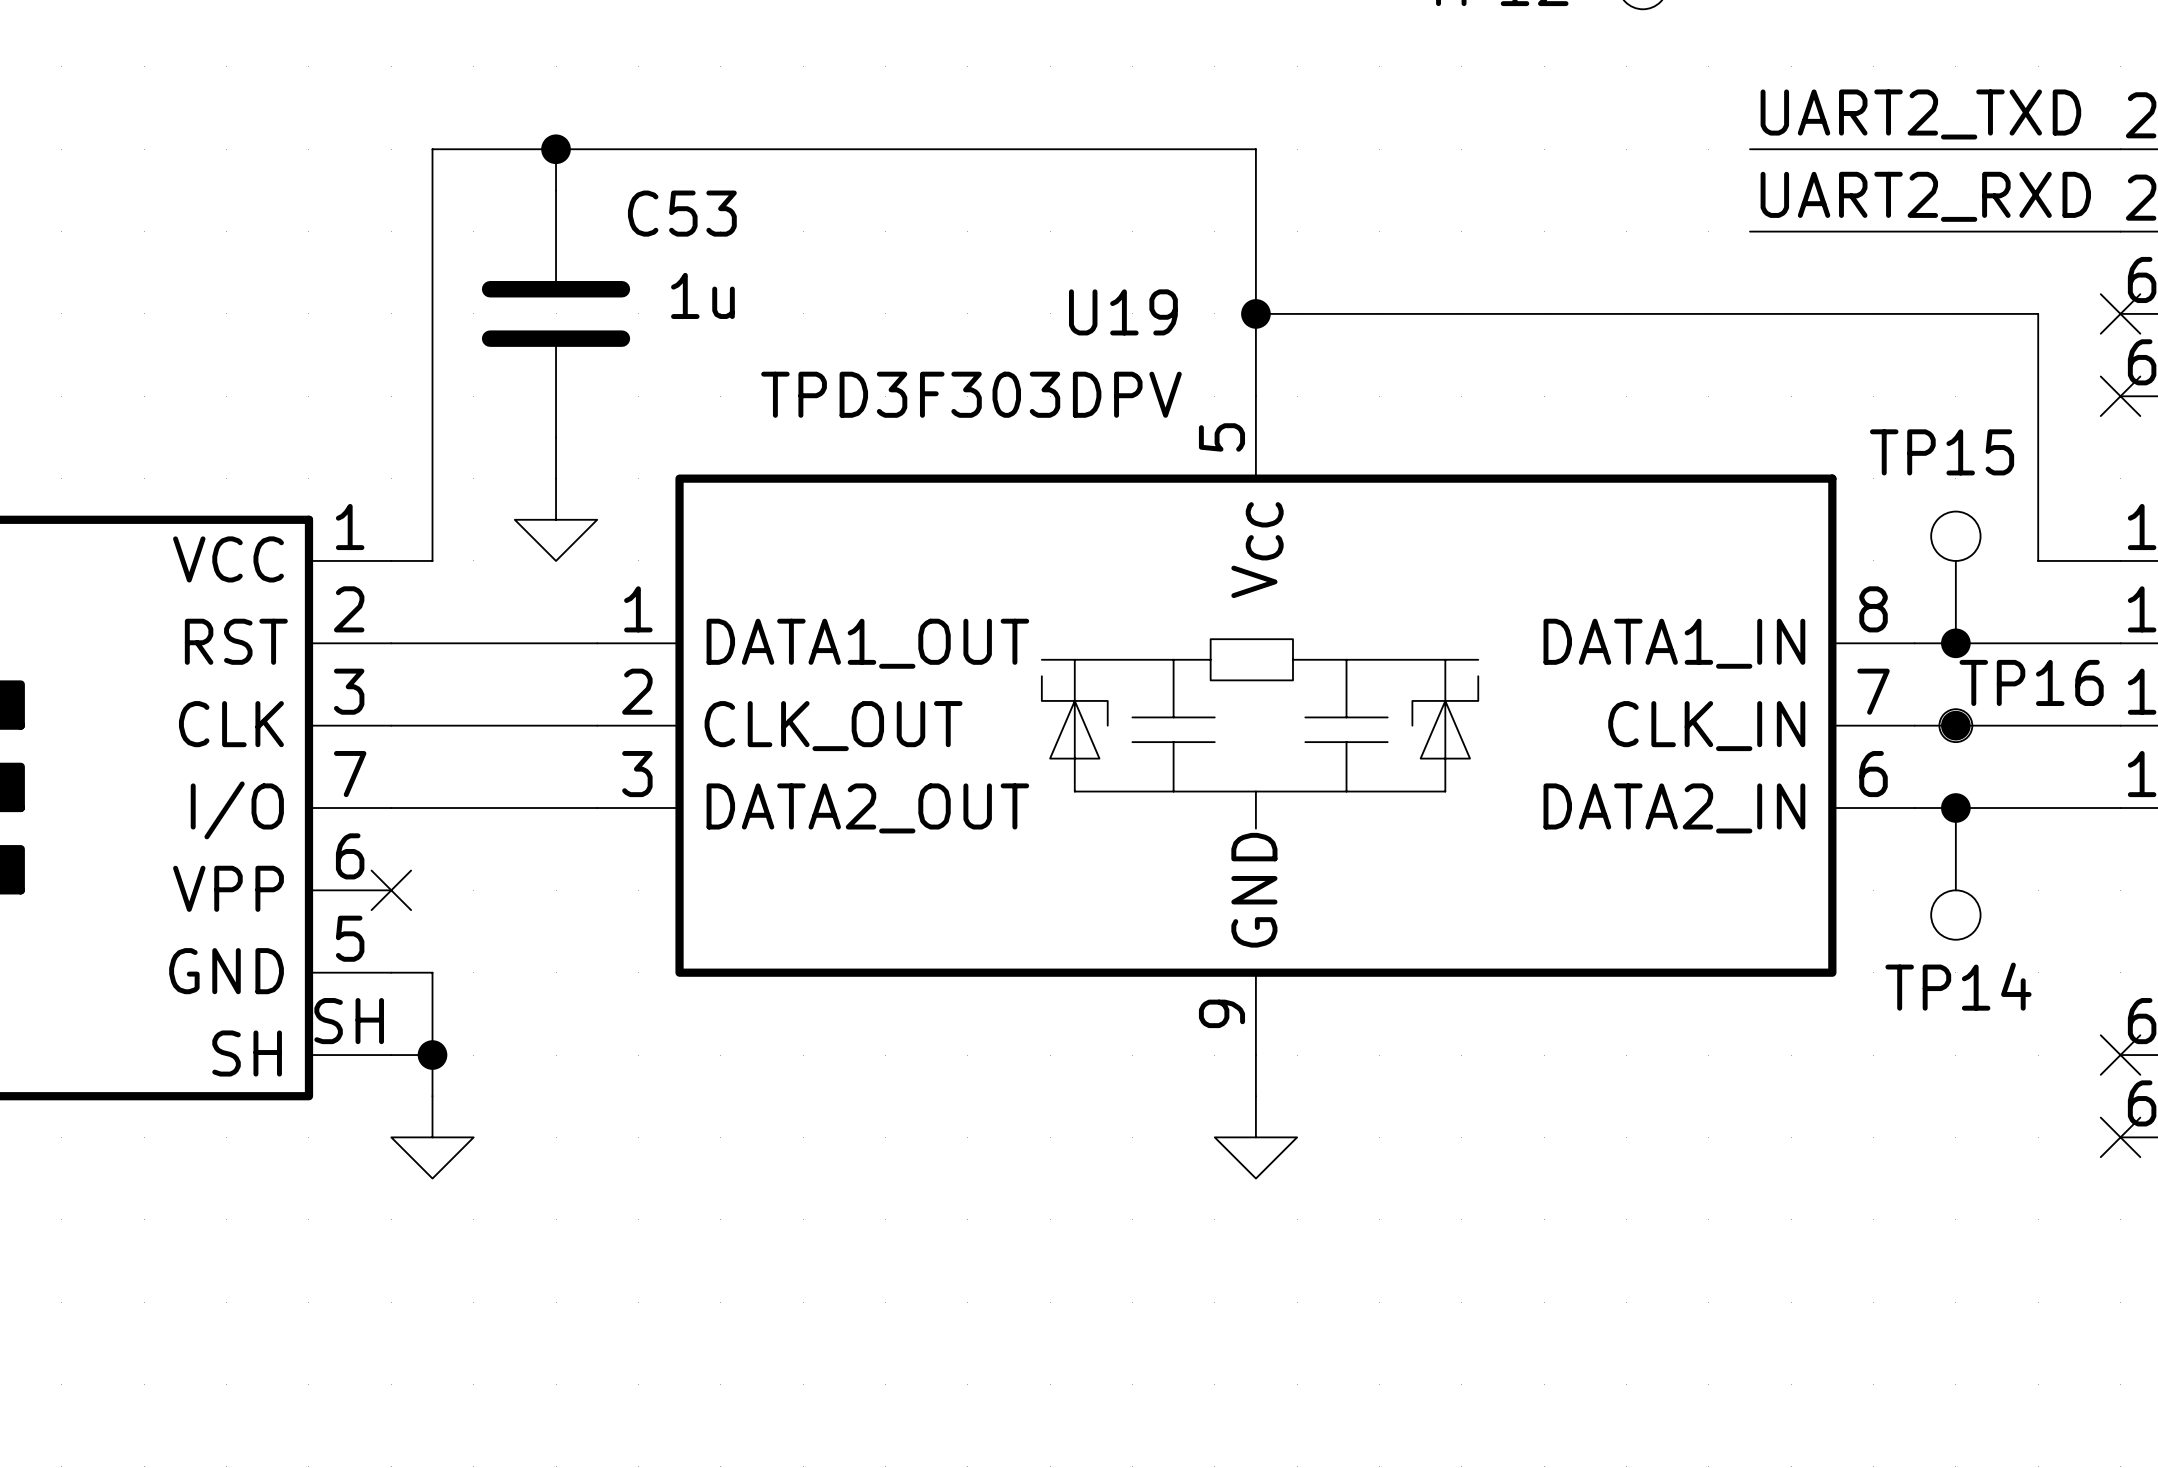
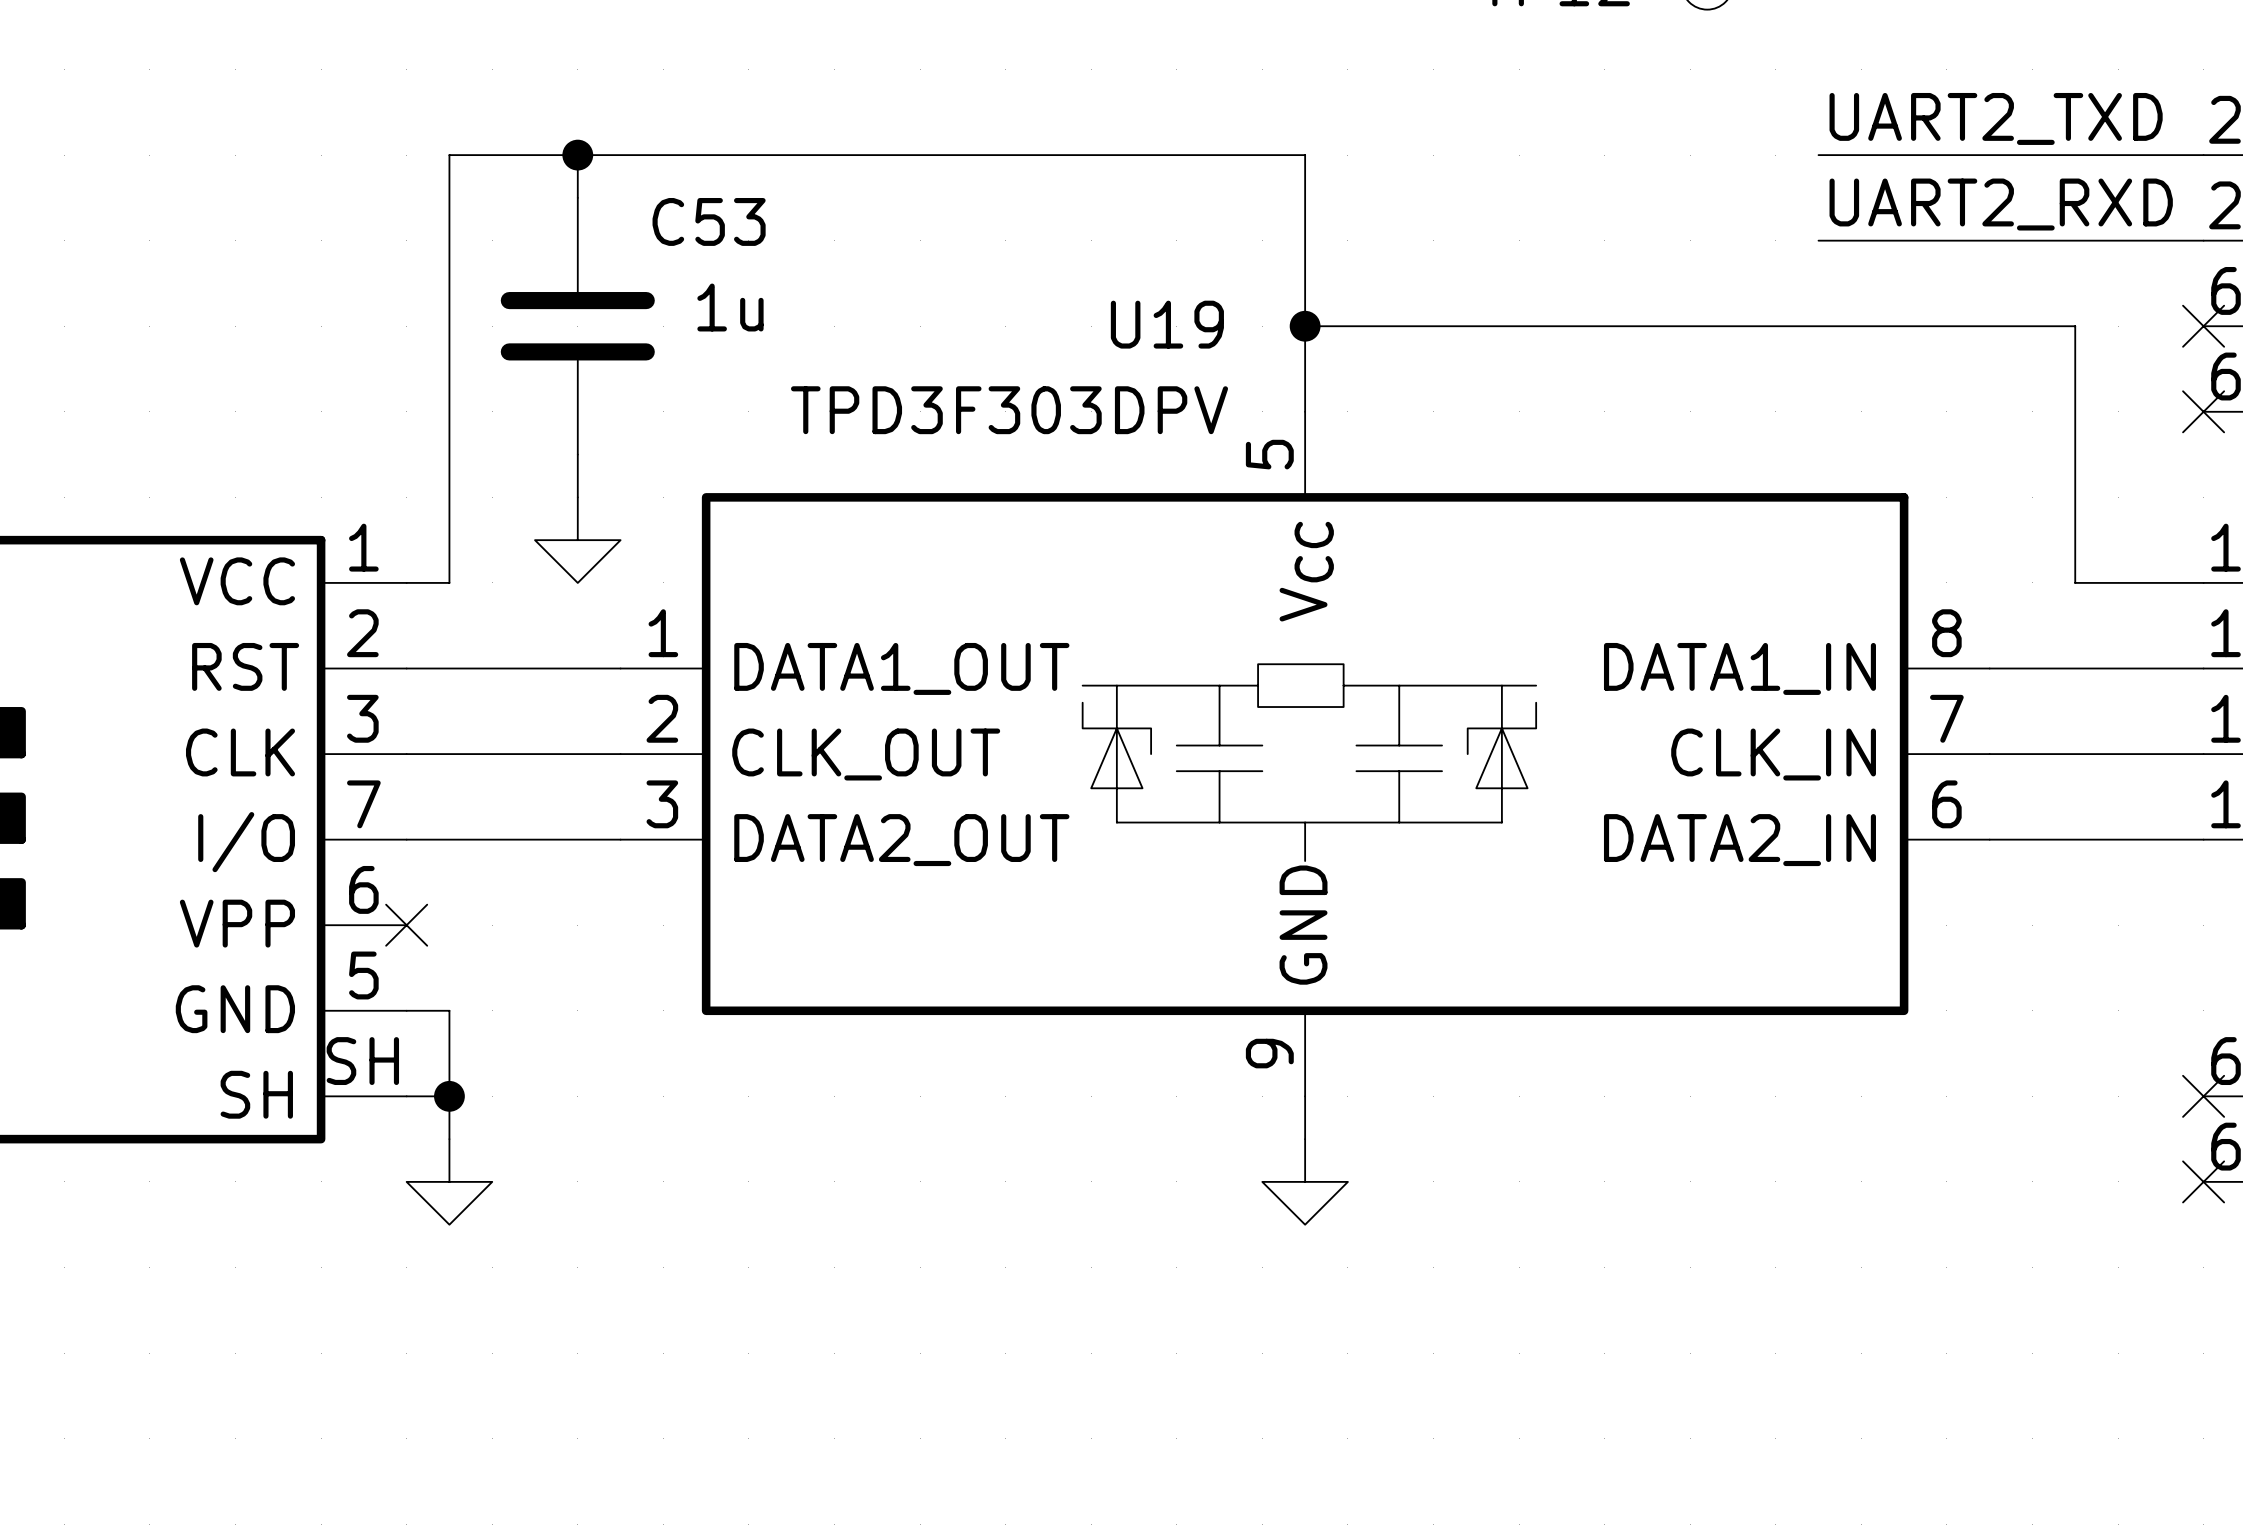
wire: (1997, 313) (2038, 313) (2038, 560) -> (2075, 326) (2075, 582) (2118, 582)
TP15: (1955, 577) -> none
junction: (1955, 643) -> none
junction: (1955, 725) -> none
TP16: (1955, 725) -> none
junction: (1955, 808) -> none
TP14: (1955, 873) -> none

